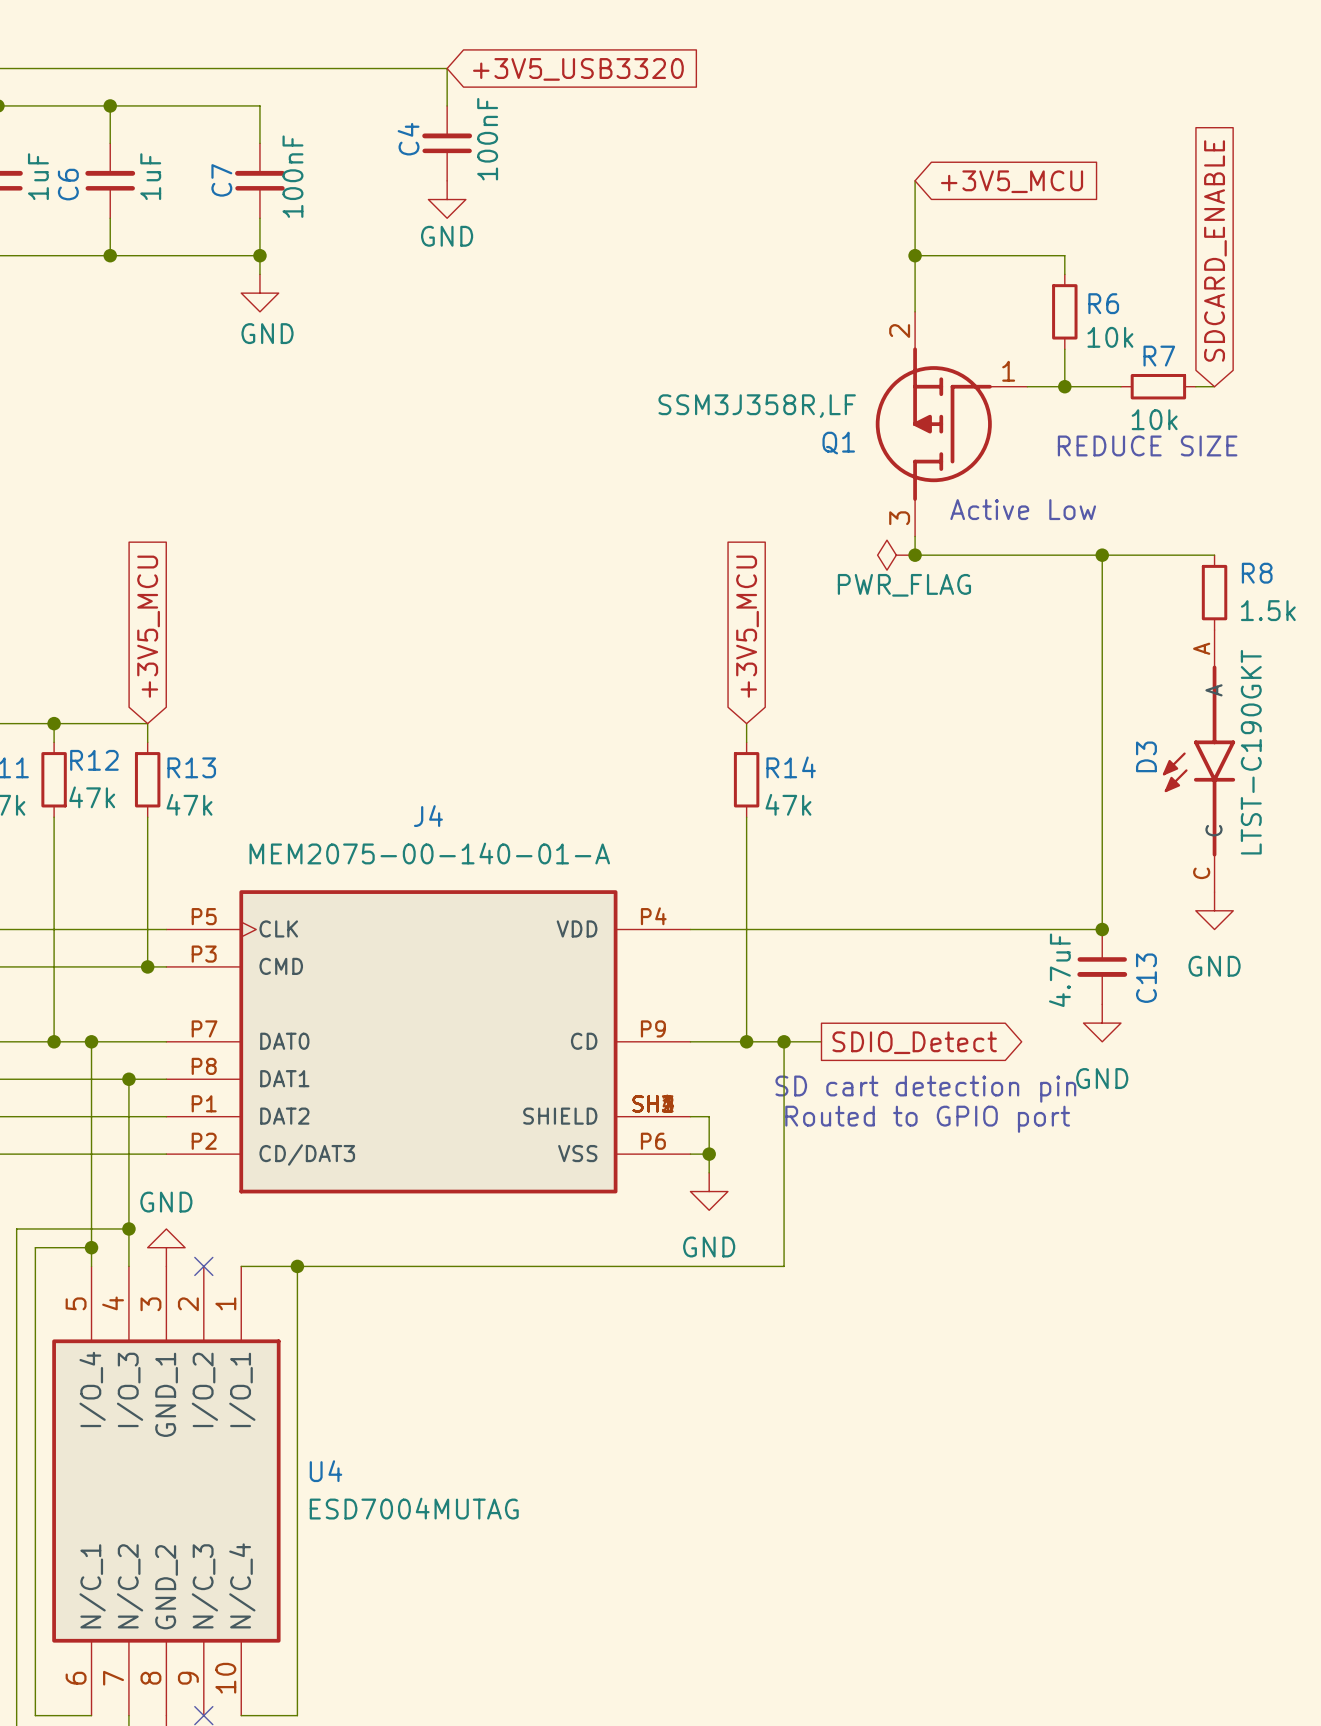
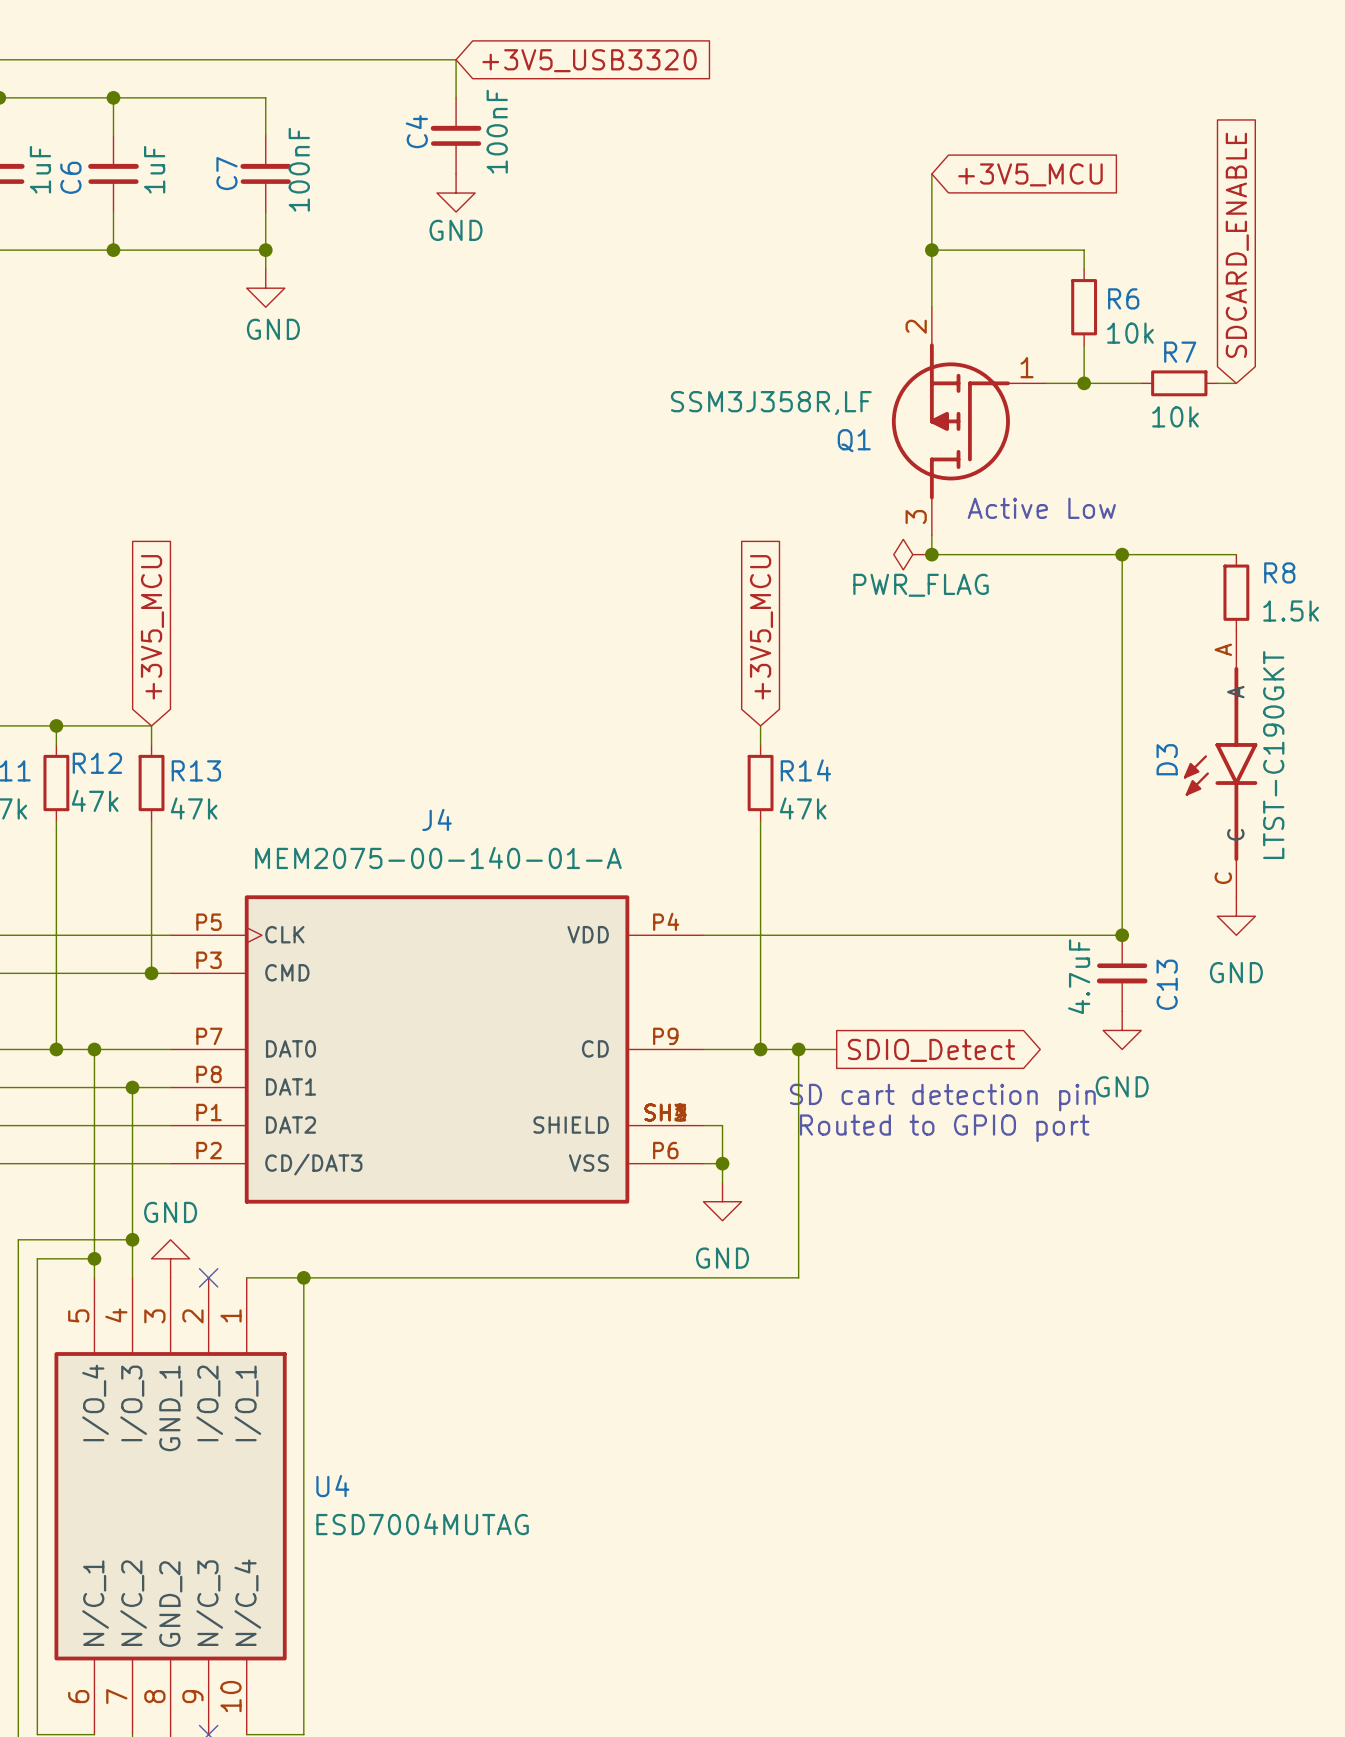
text: REDUCE SIZE (1147, 445) -> none

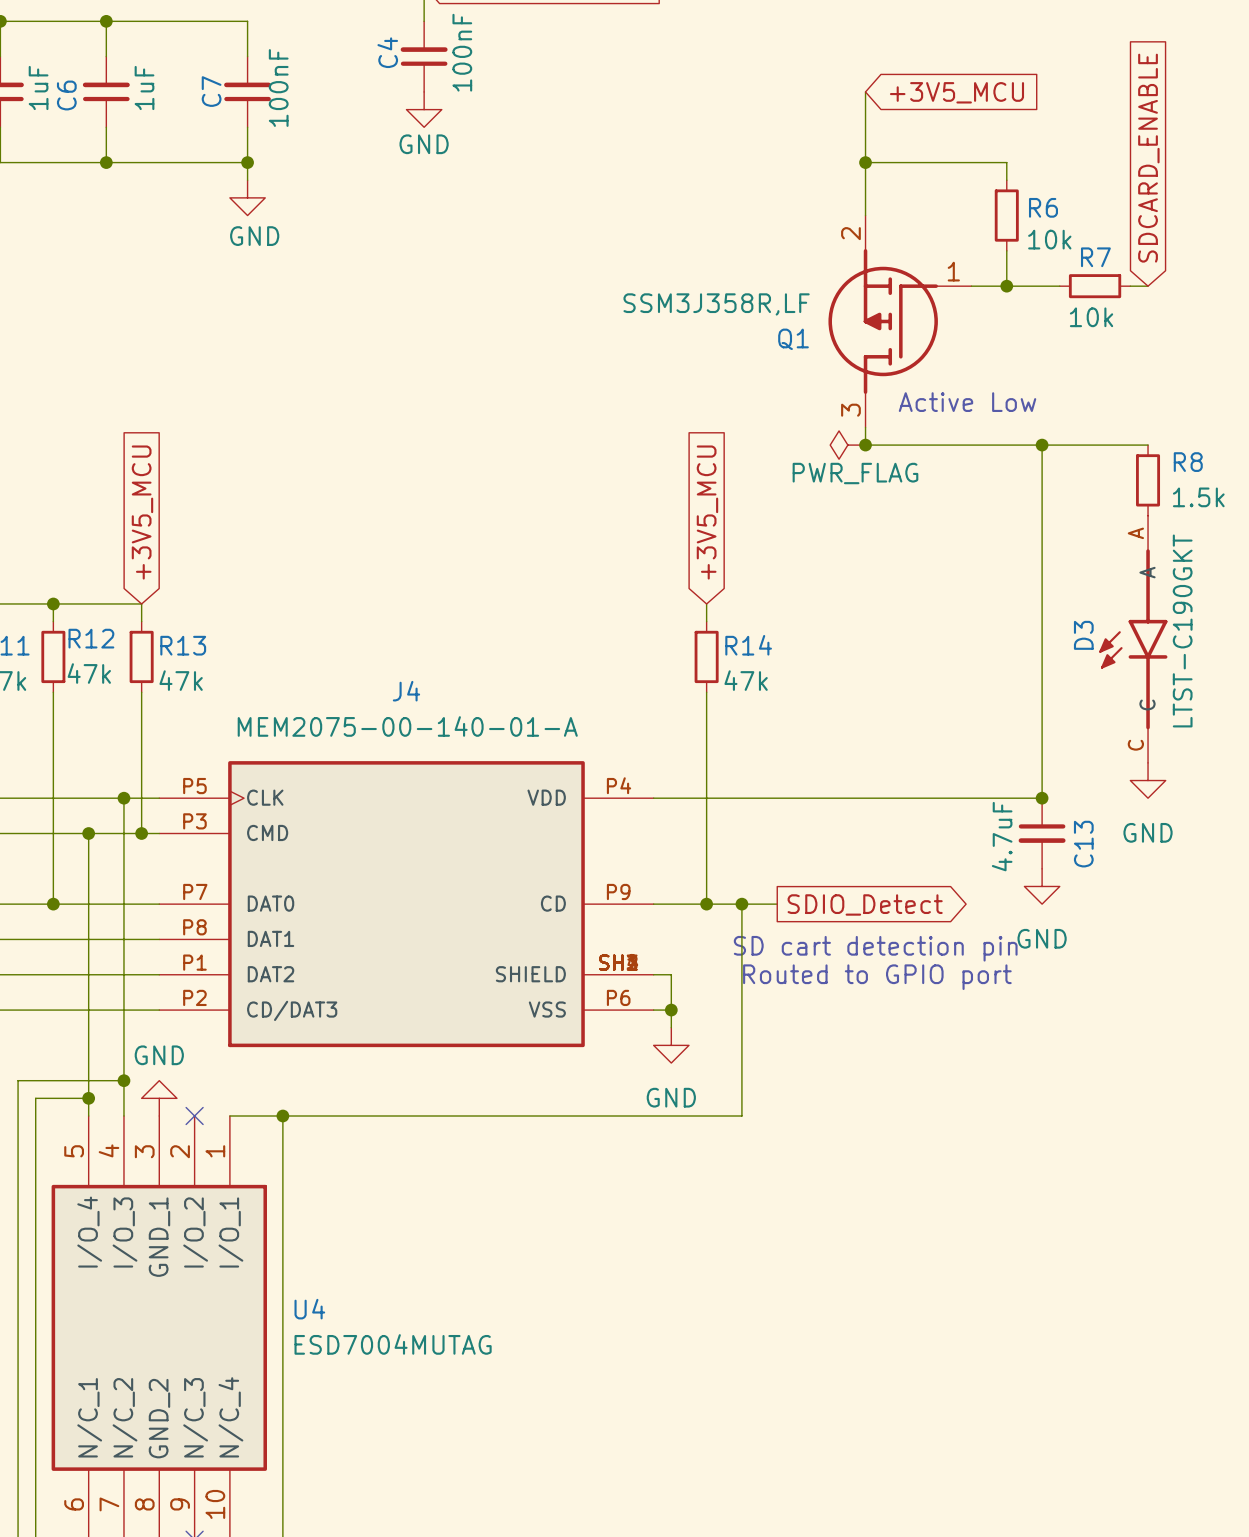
wire: none -> (123, 798) (123, 939)
junction: none -> (123, 798)
wire: none -> (88, 833) (88, 904)
junction: none -> (88, 833)
junction: (94, 1049) -> none
junction: (132, 1087) -> none

